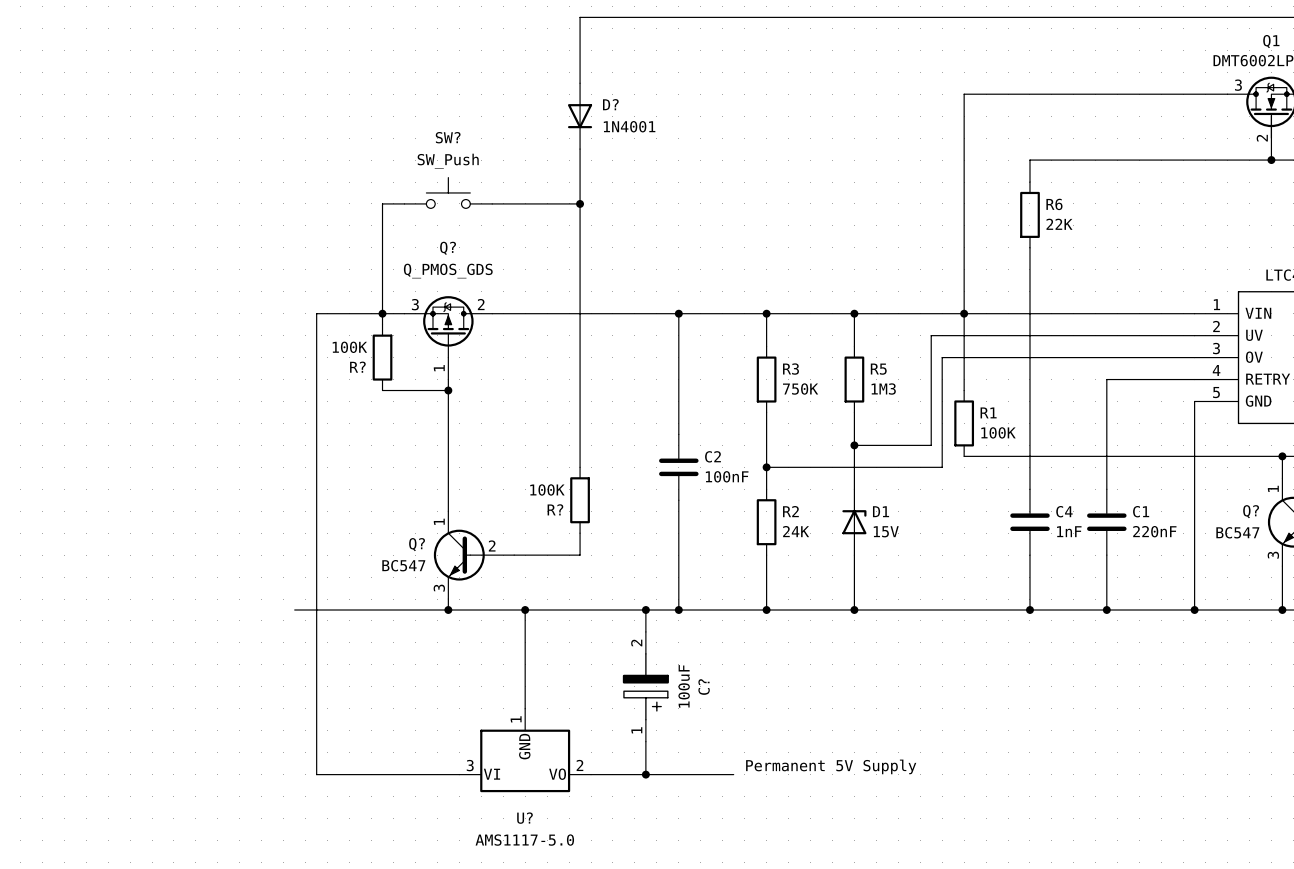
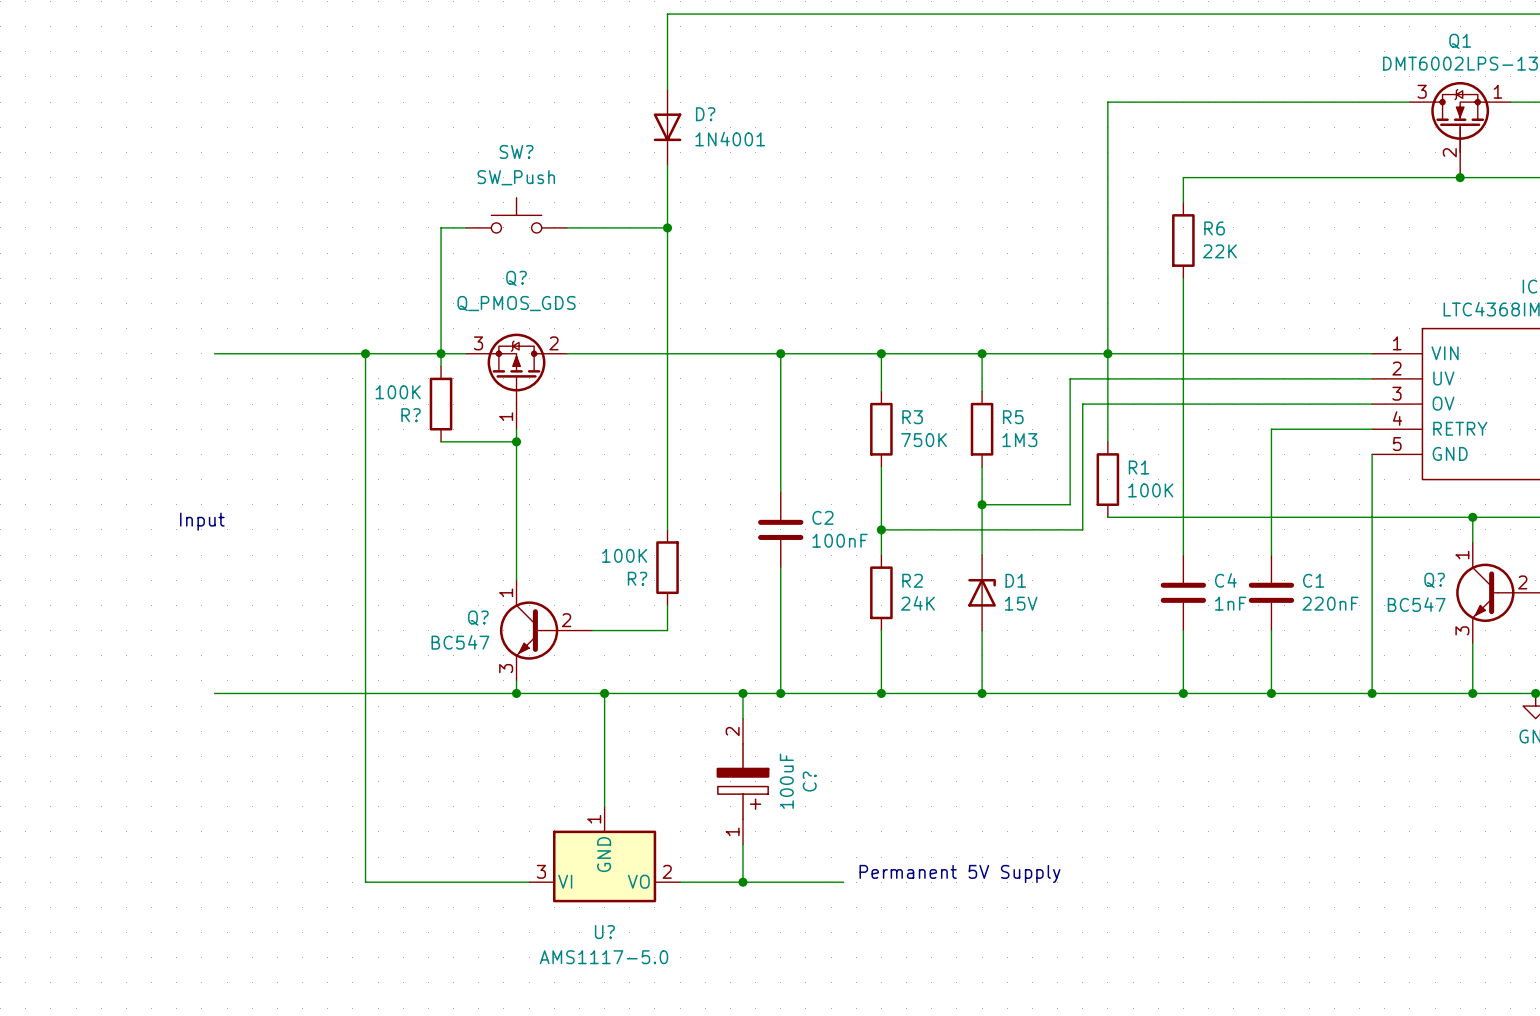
wire: none -> (214, 353) (365, 353)
junction: none -> (365, 353)
text: none -> Input (202, 521)
wire: none -> (214, 693) (340, 693)

